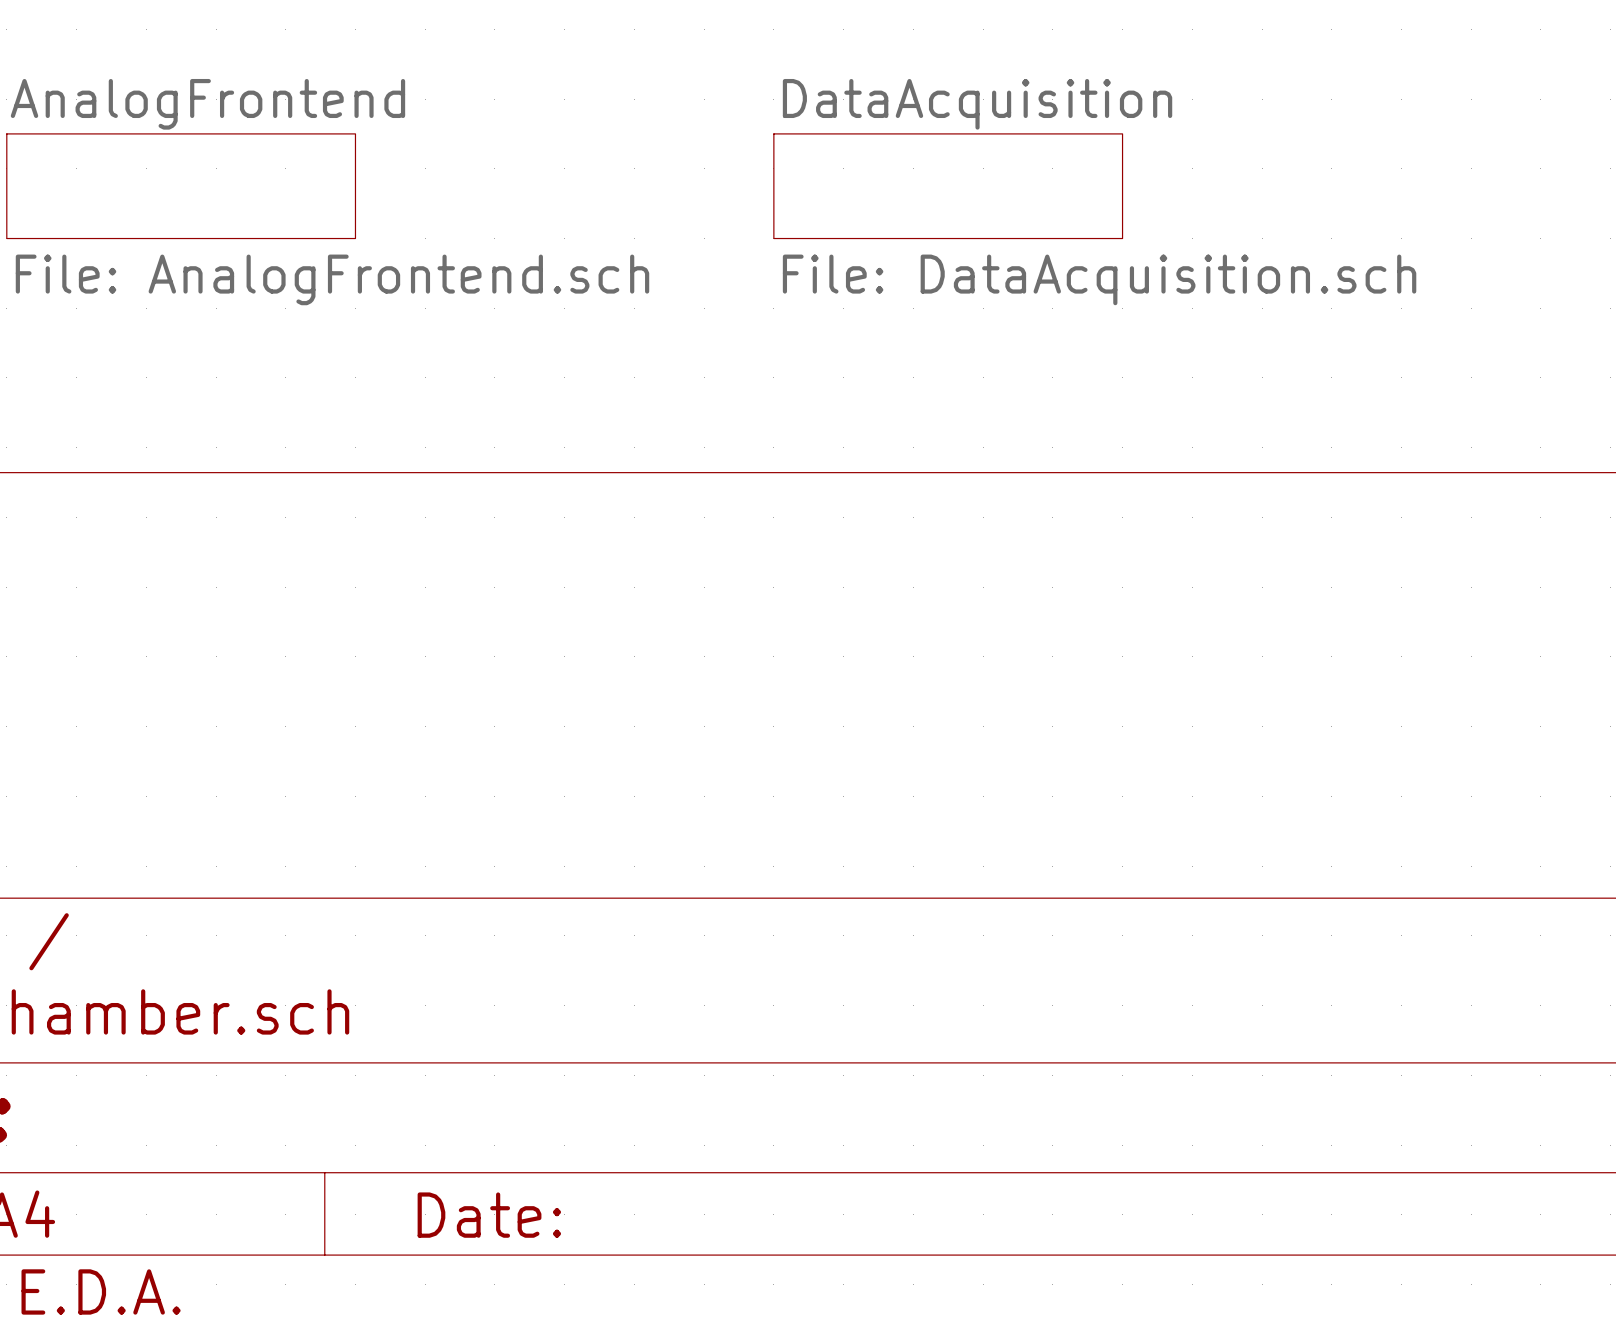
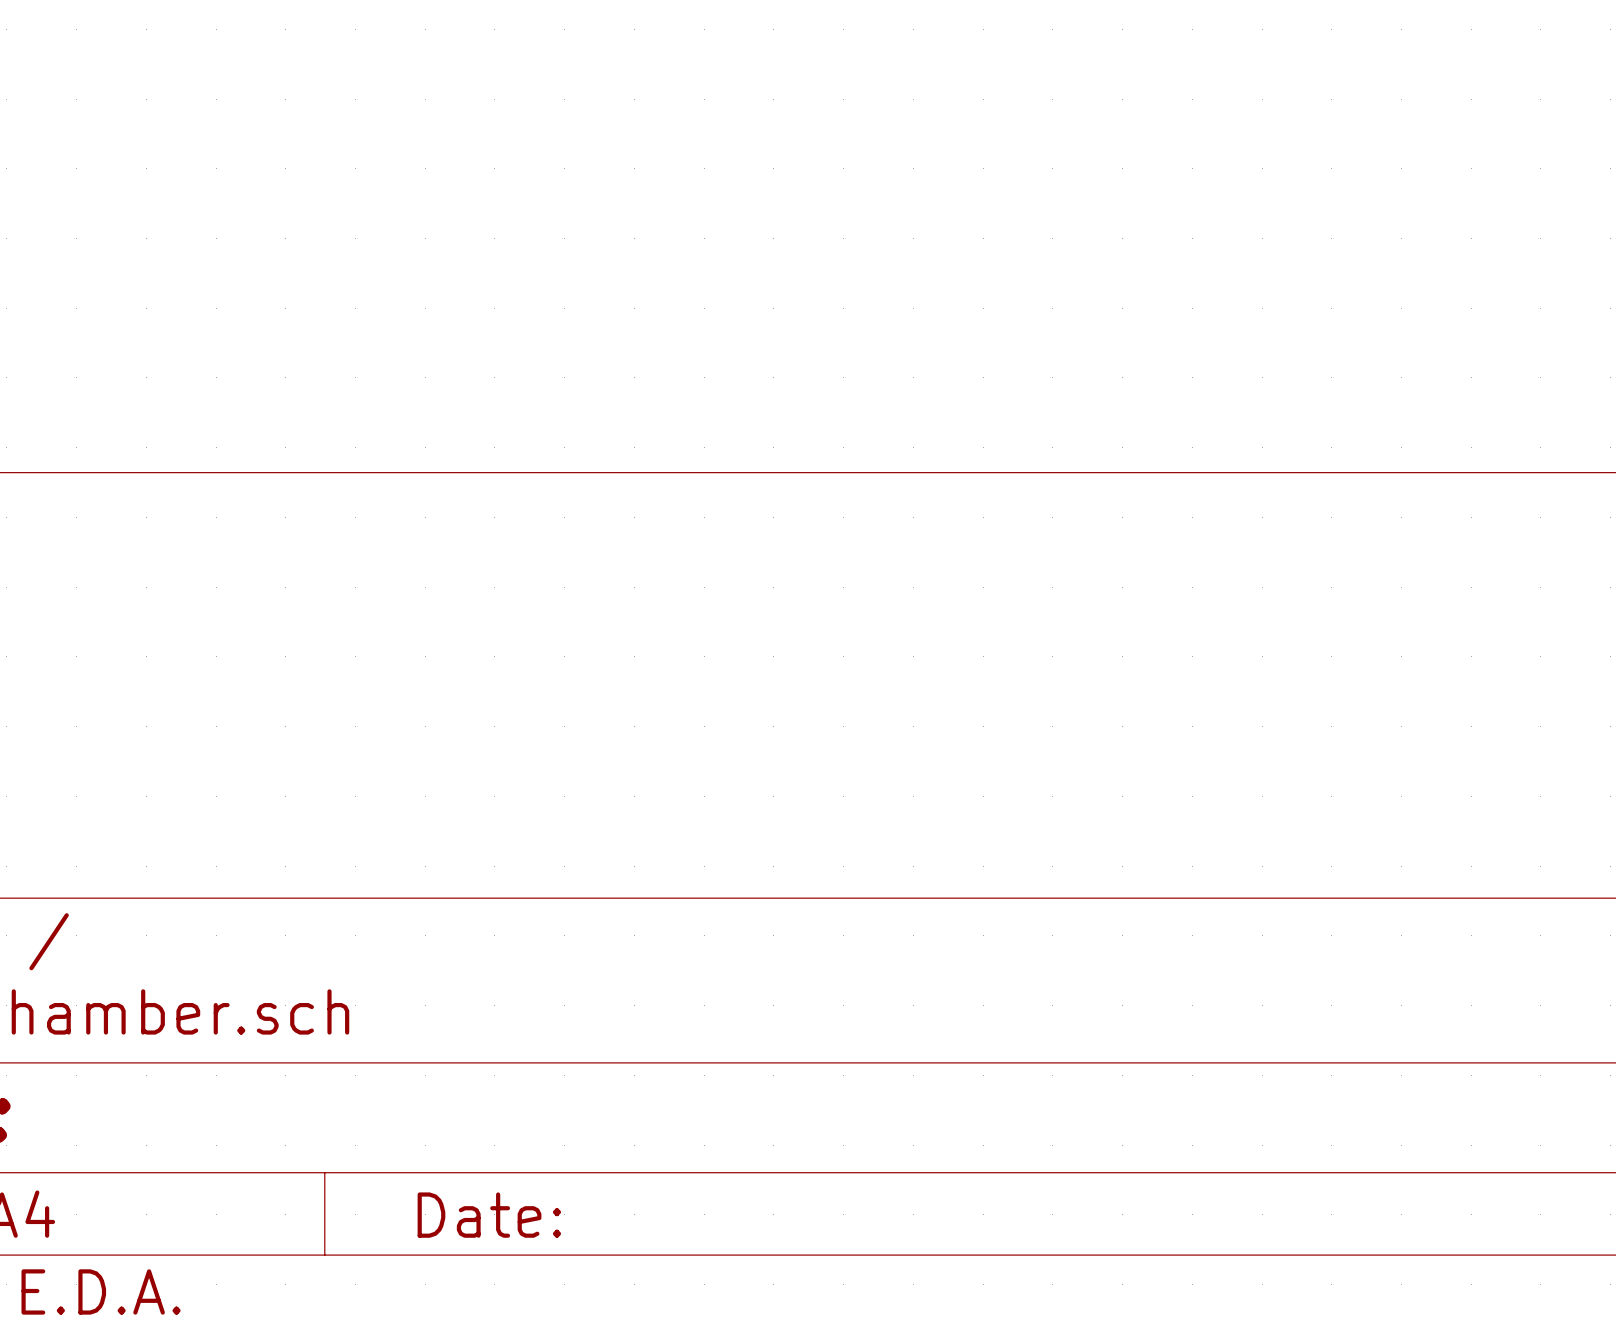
sheet AnalogFrontend: File: AnalogFrontend.sch (181, 186) -> none
sheet DataAcquisition: File: DataAcquisition.sch (948, 186) -> none

